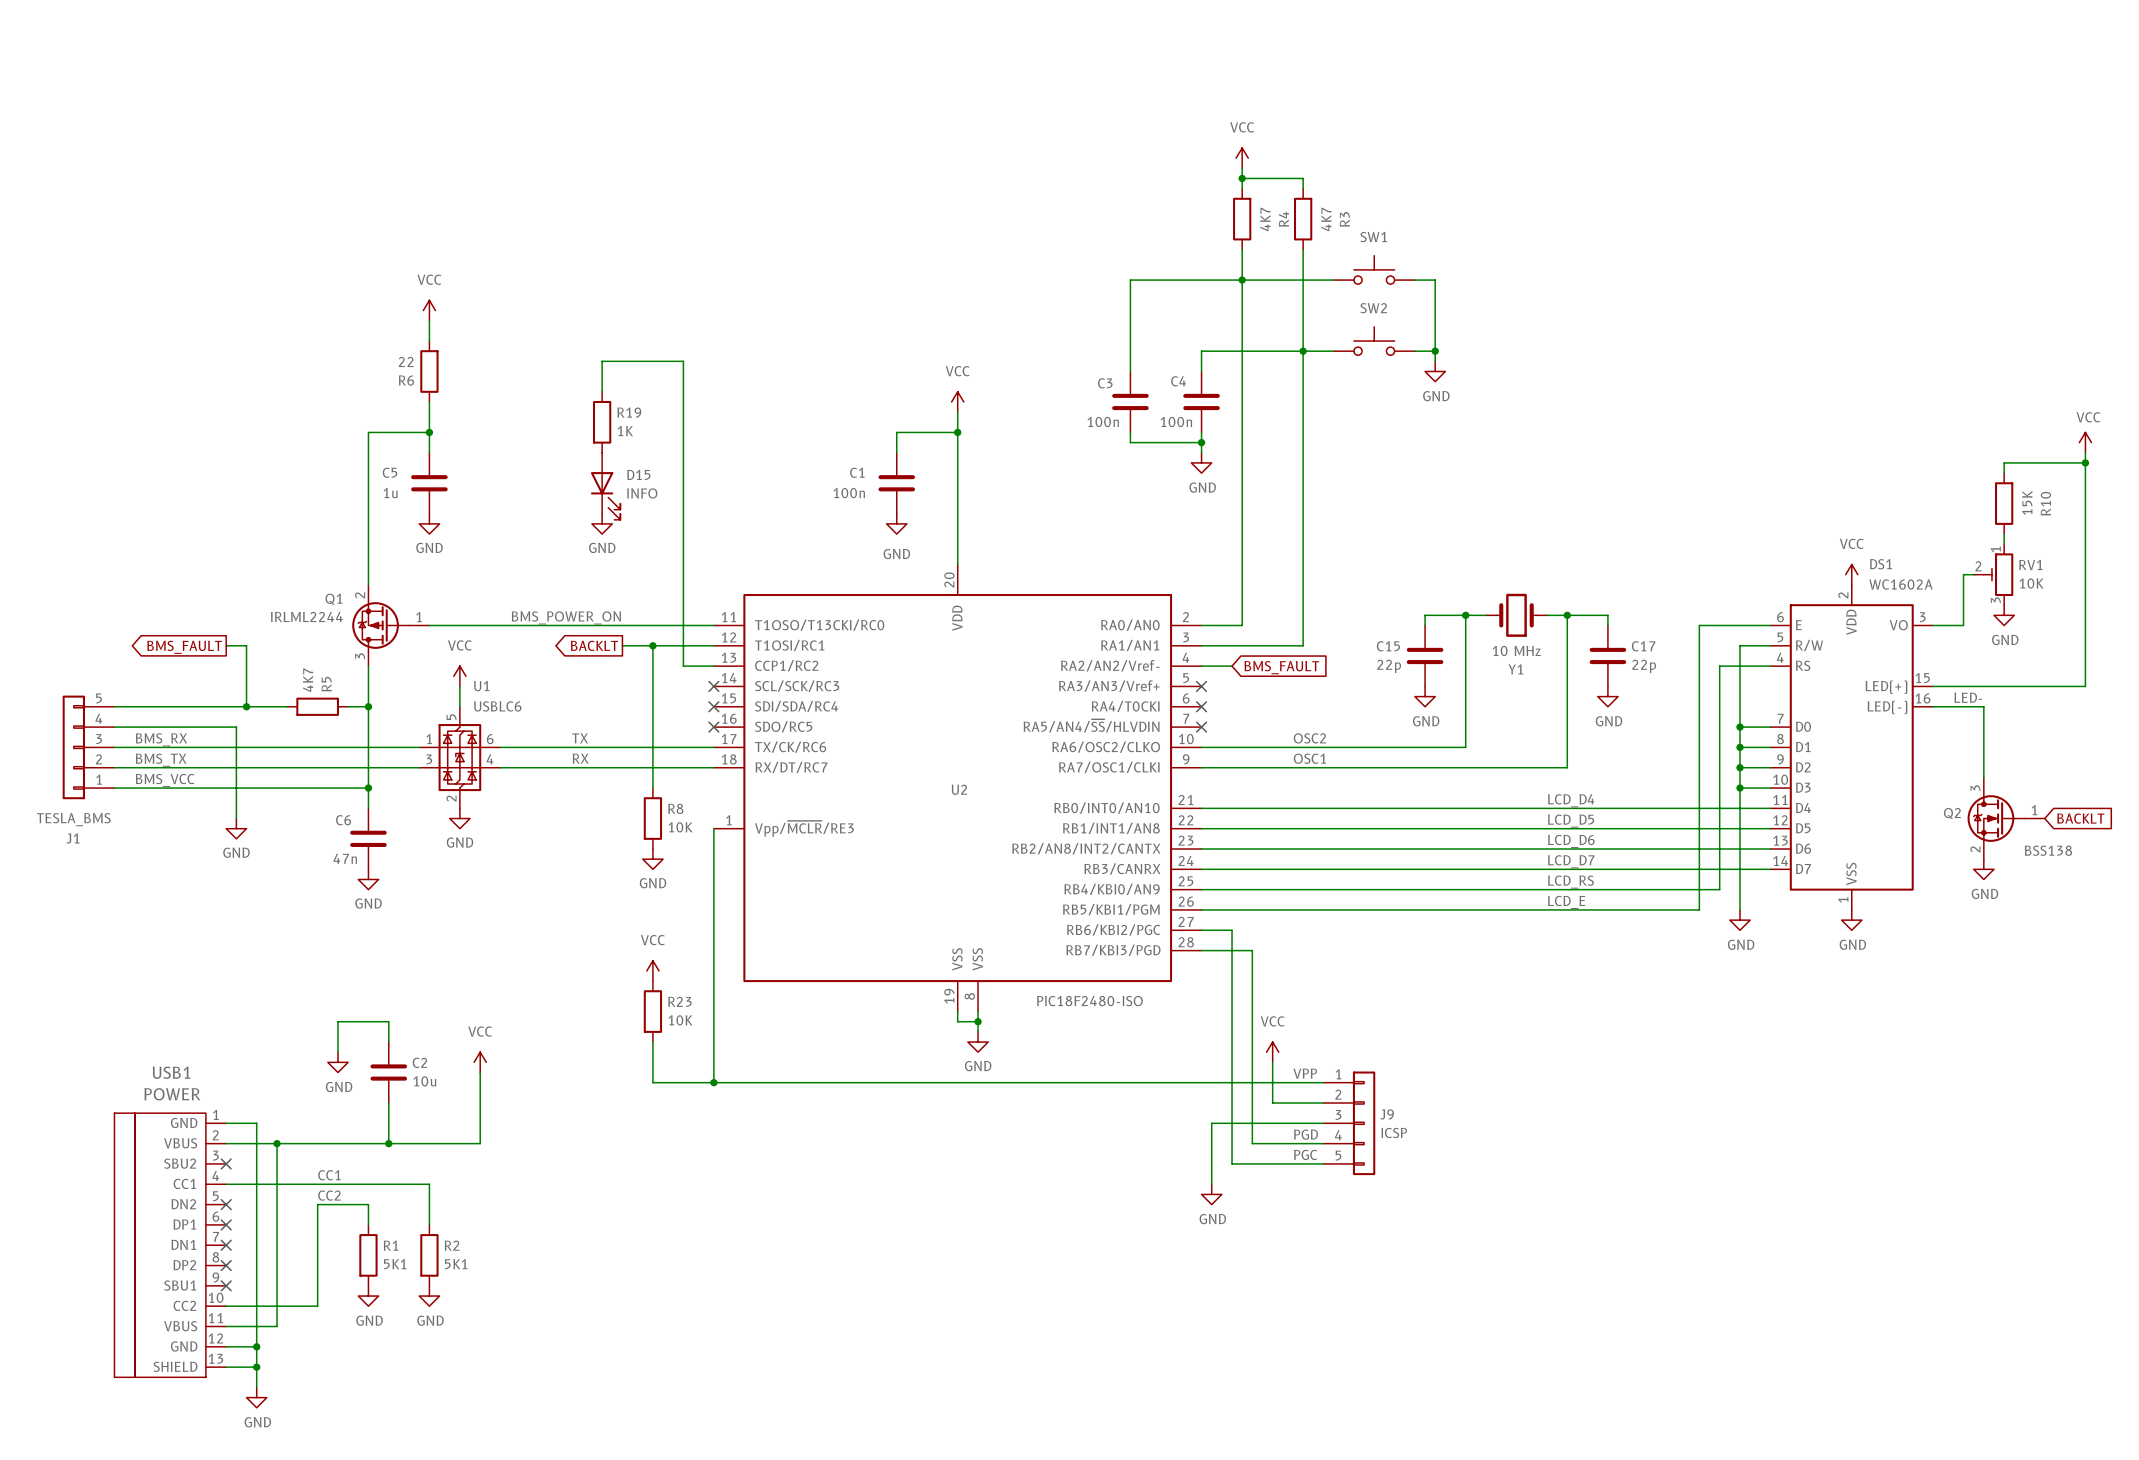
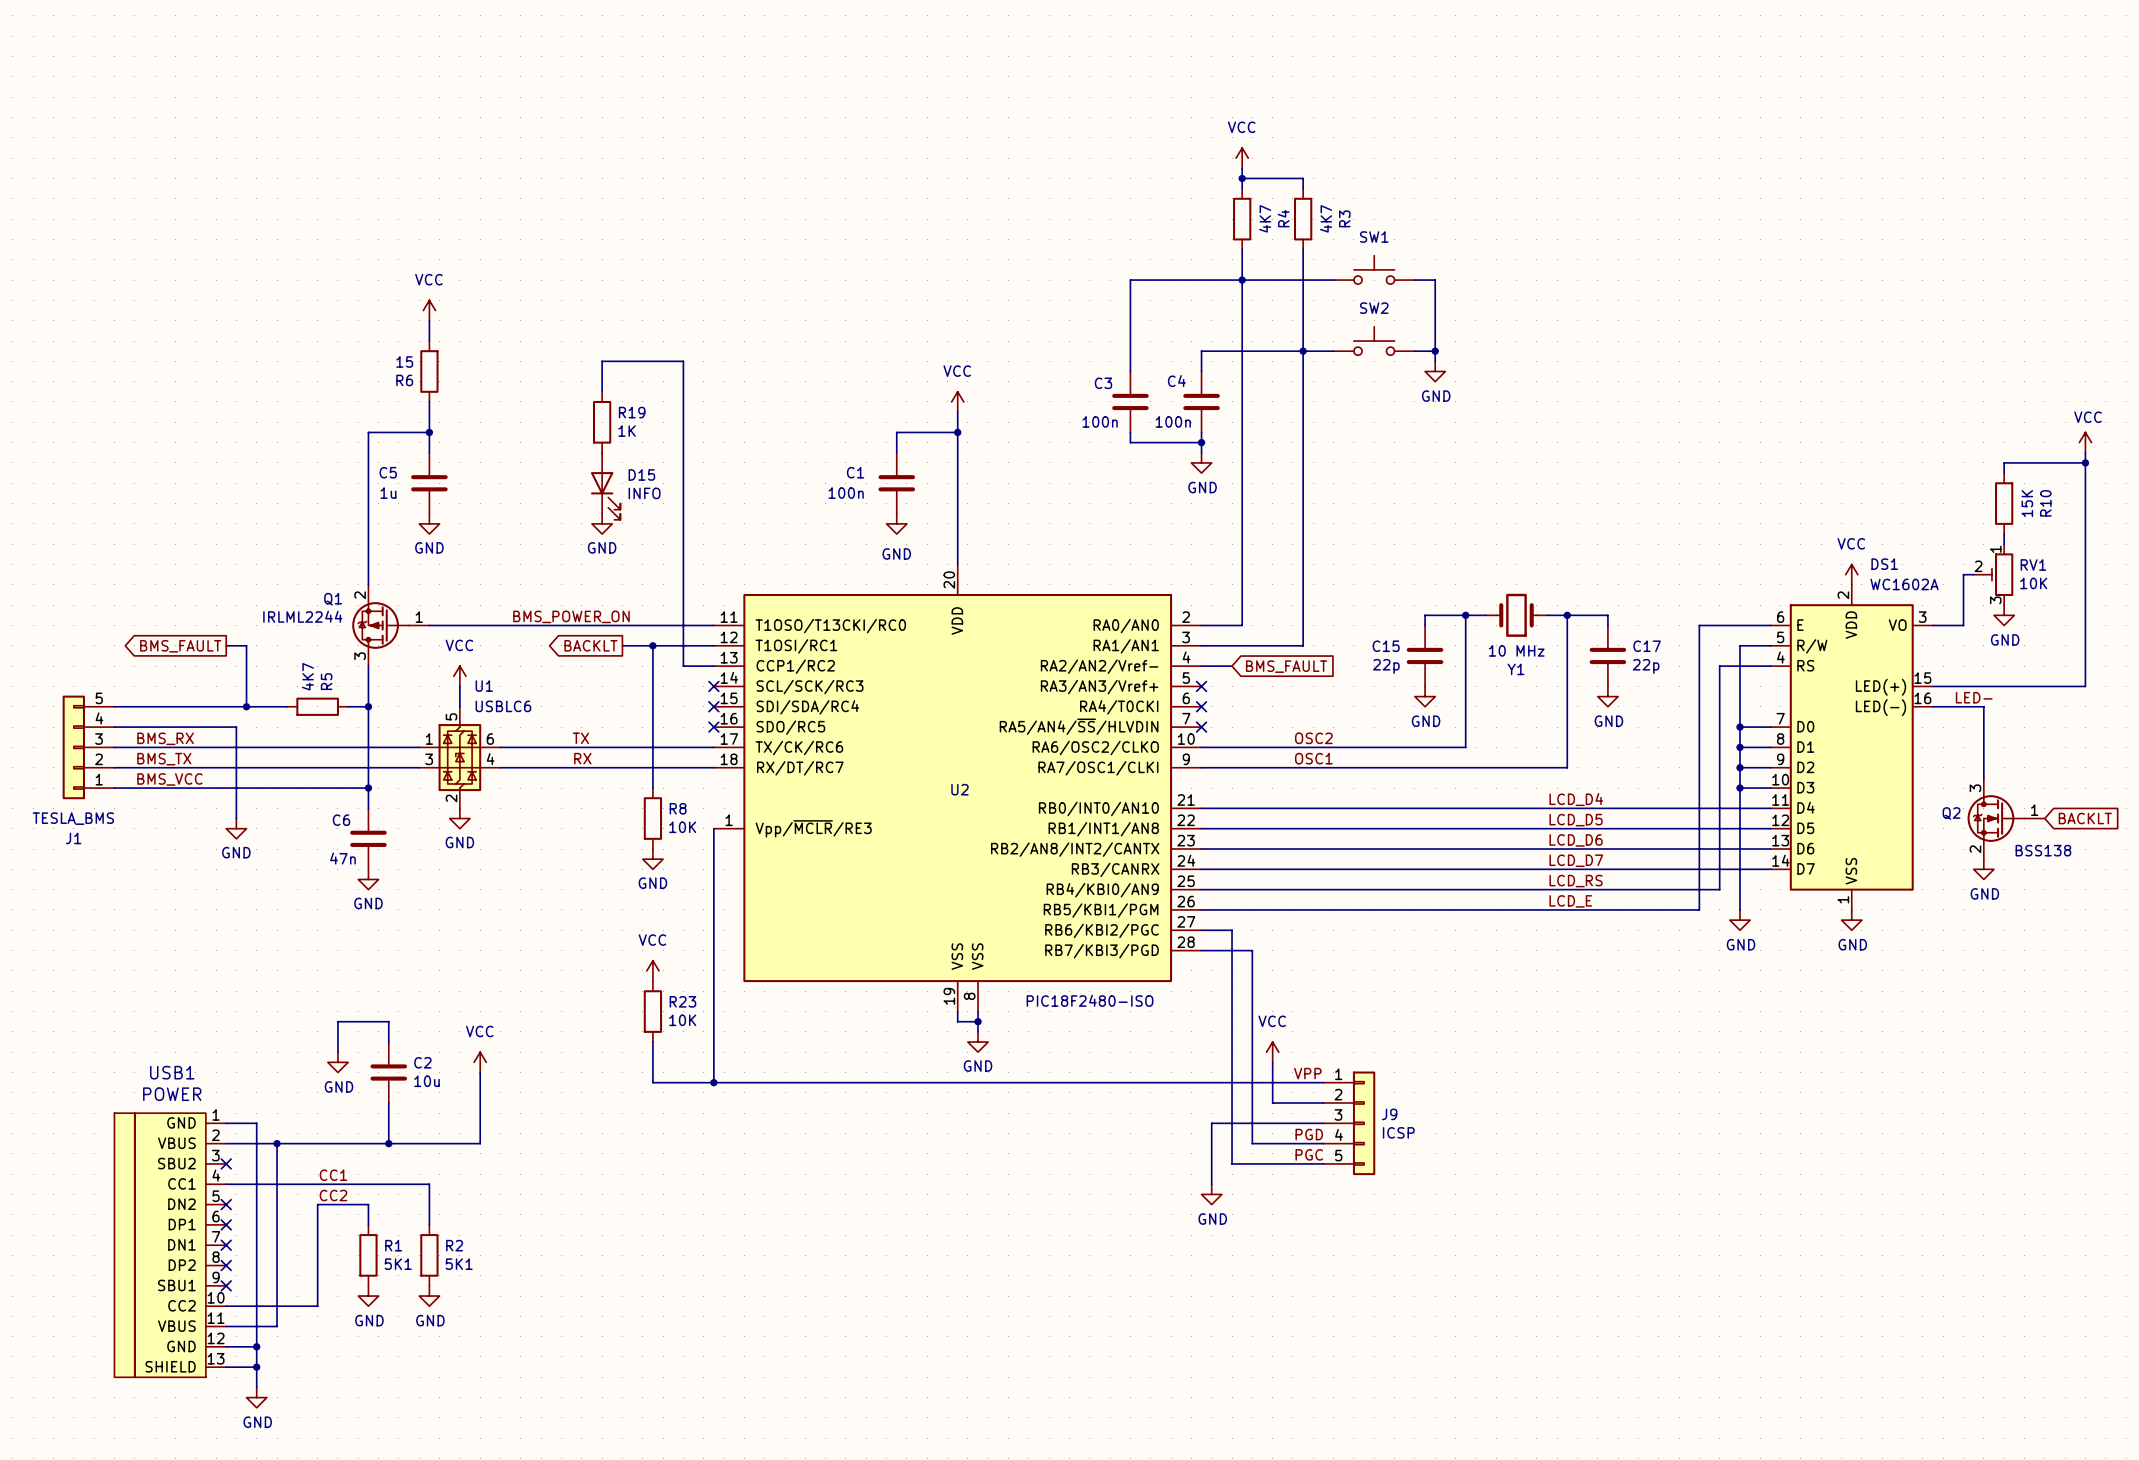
R6 value: 22 (406, 361) -> 15 (404, 361)

